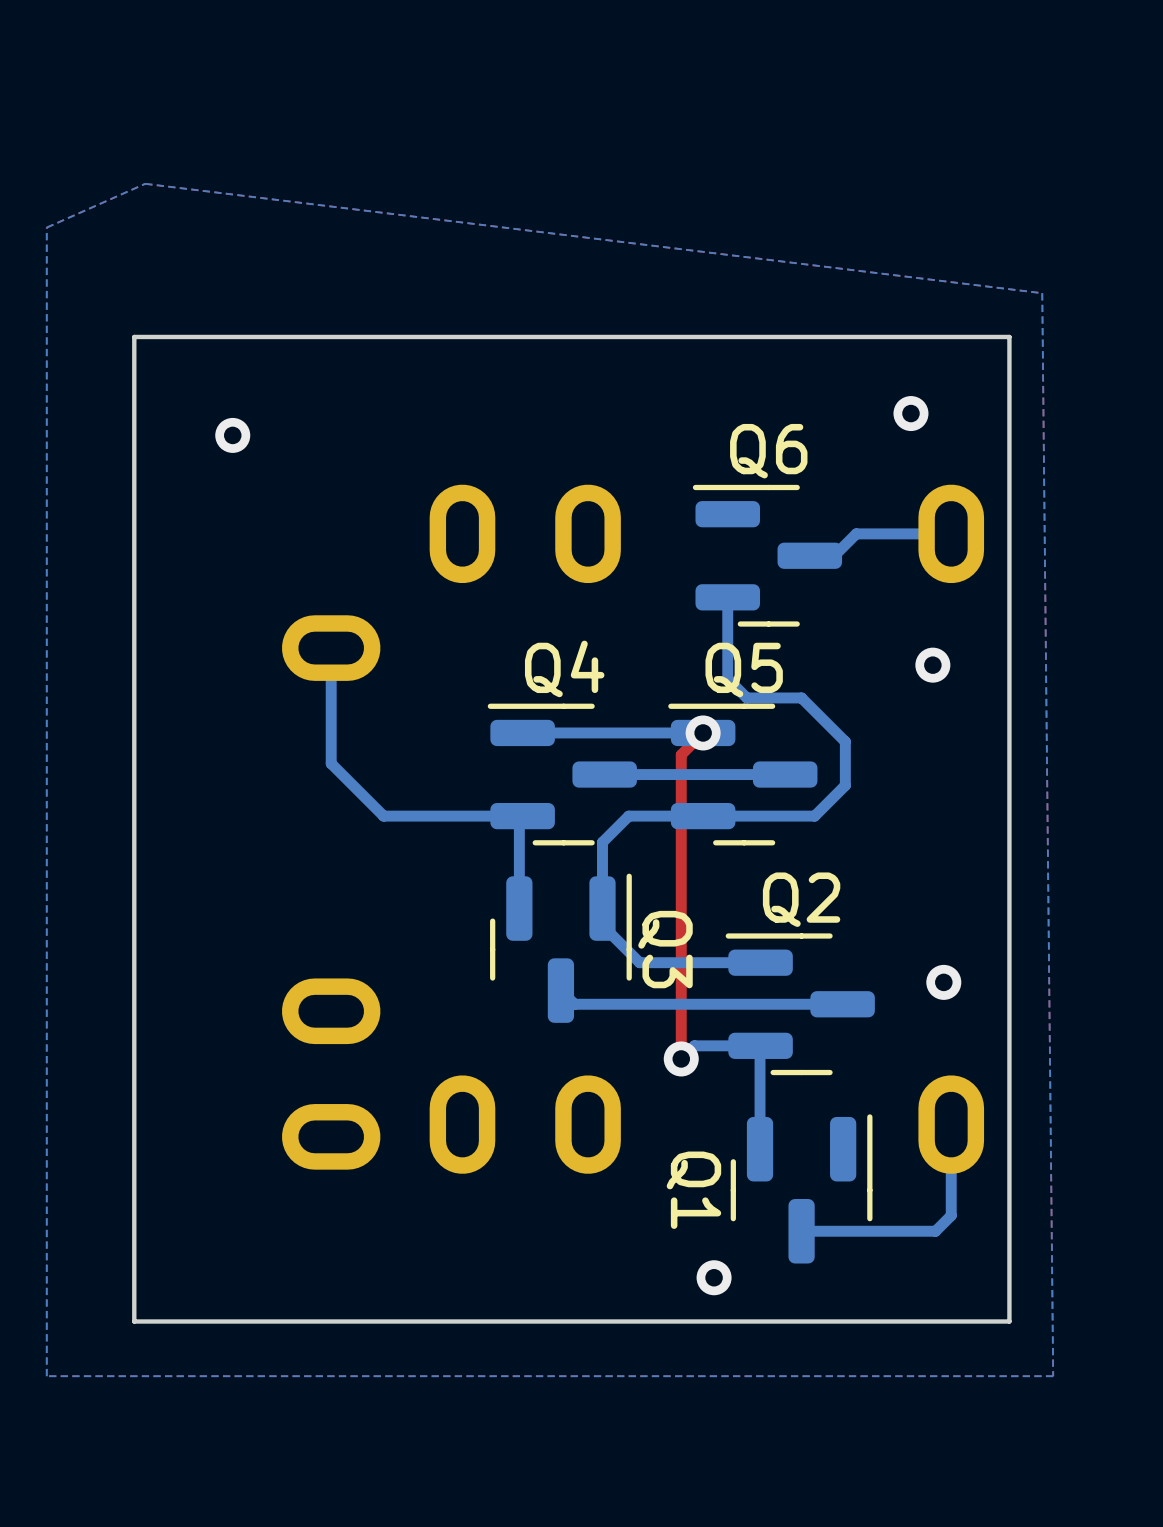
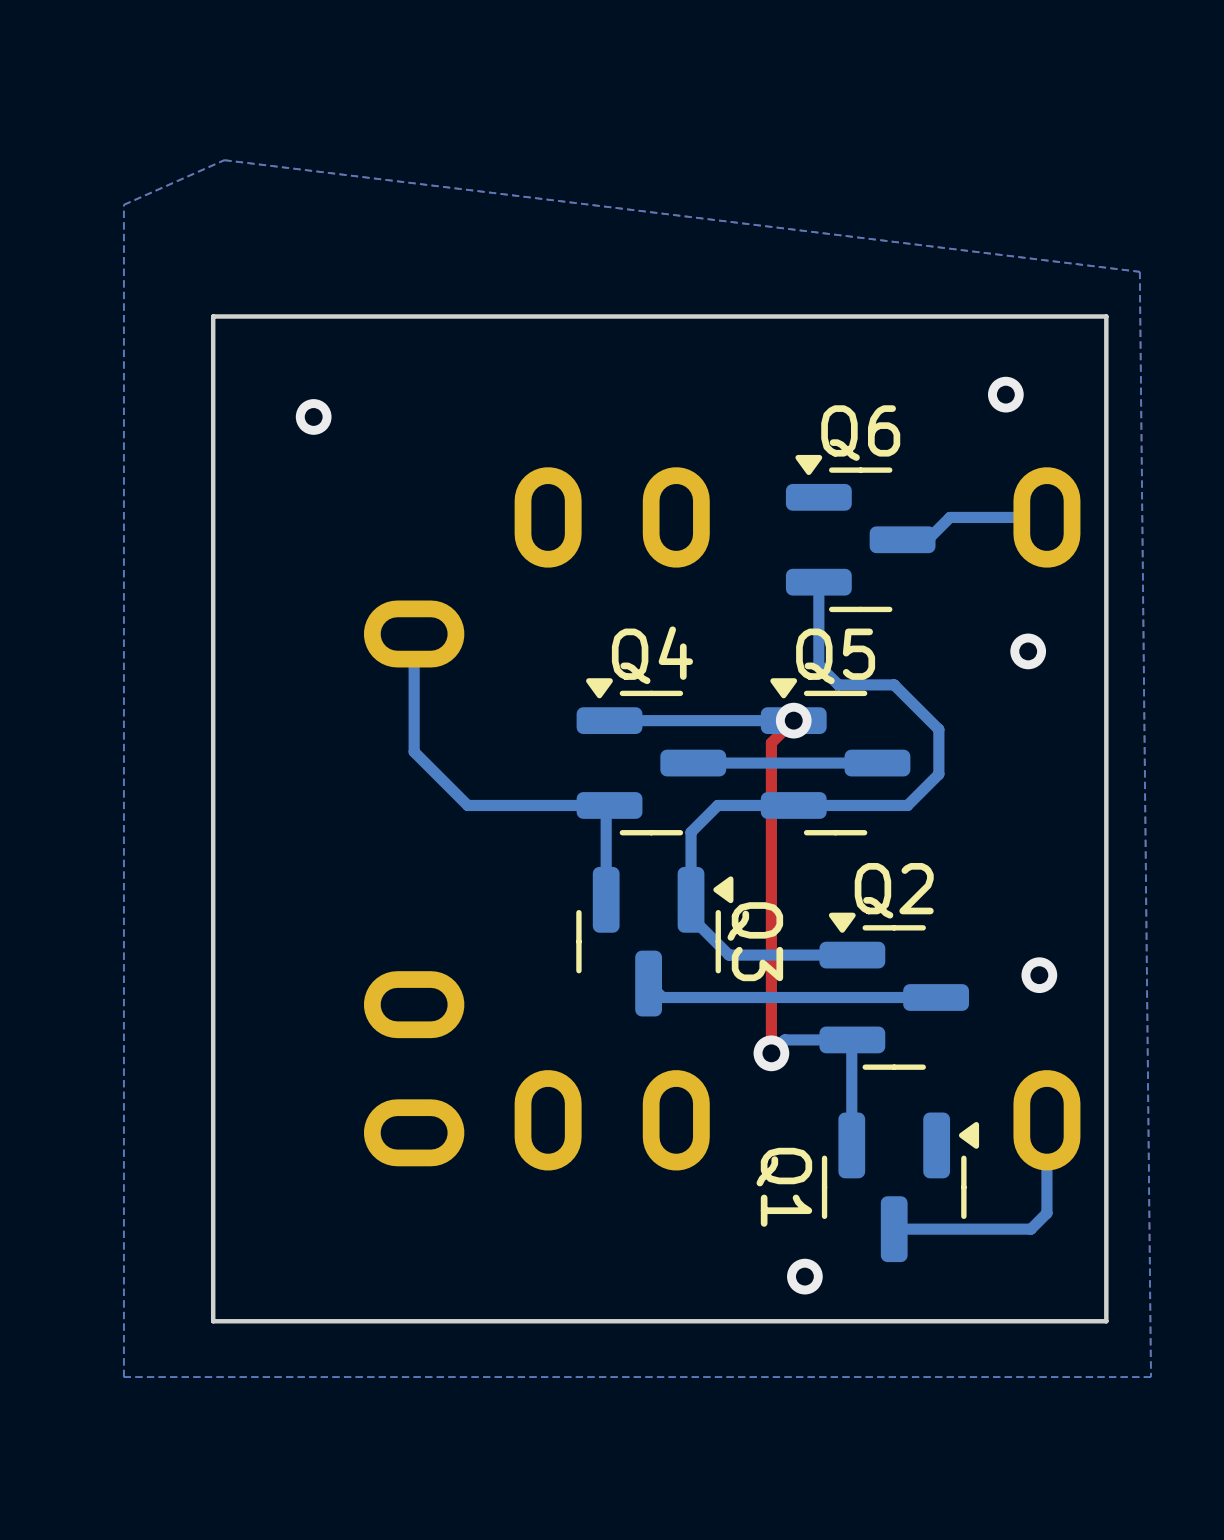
Q6 footprint: [692, 484, 843, 627] -> [785, 454, 936, 613]
Q4 footprint: [487, 703, 637, 846] -> [576, 678, 727, 836]
Q5 footprint: [668, 703, 818, 846] -> [760, 678, 911, 836]
Q3 footprint: [490, 873, 632, 1023] -> [576, 866, 734, 1017]
Q2 footprint: [725, 933, 875, 1076] -> [819, 912, 970, 1070]
Q1 footprint: [730, 1114, 873, 1264] -> [821, 1112, 980, 1263]

